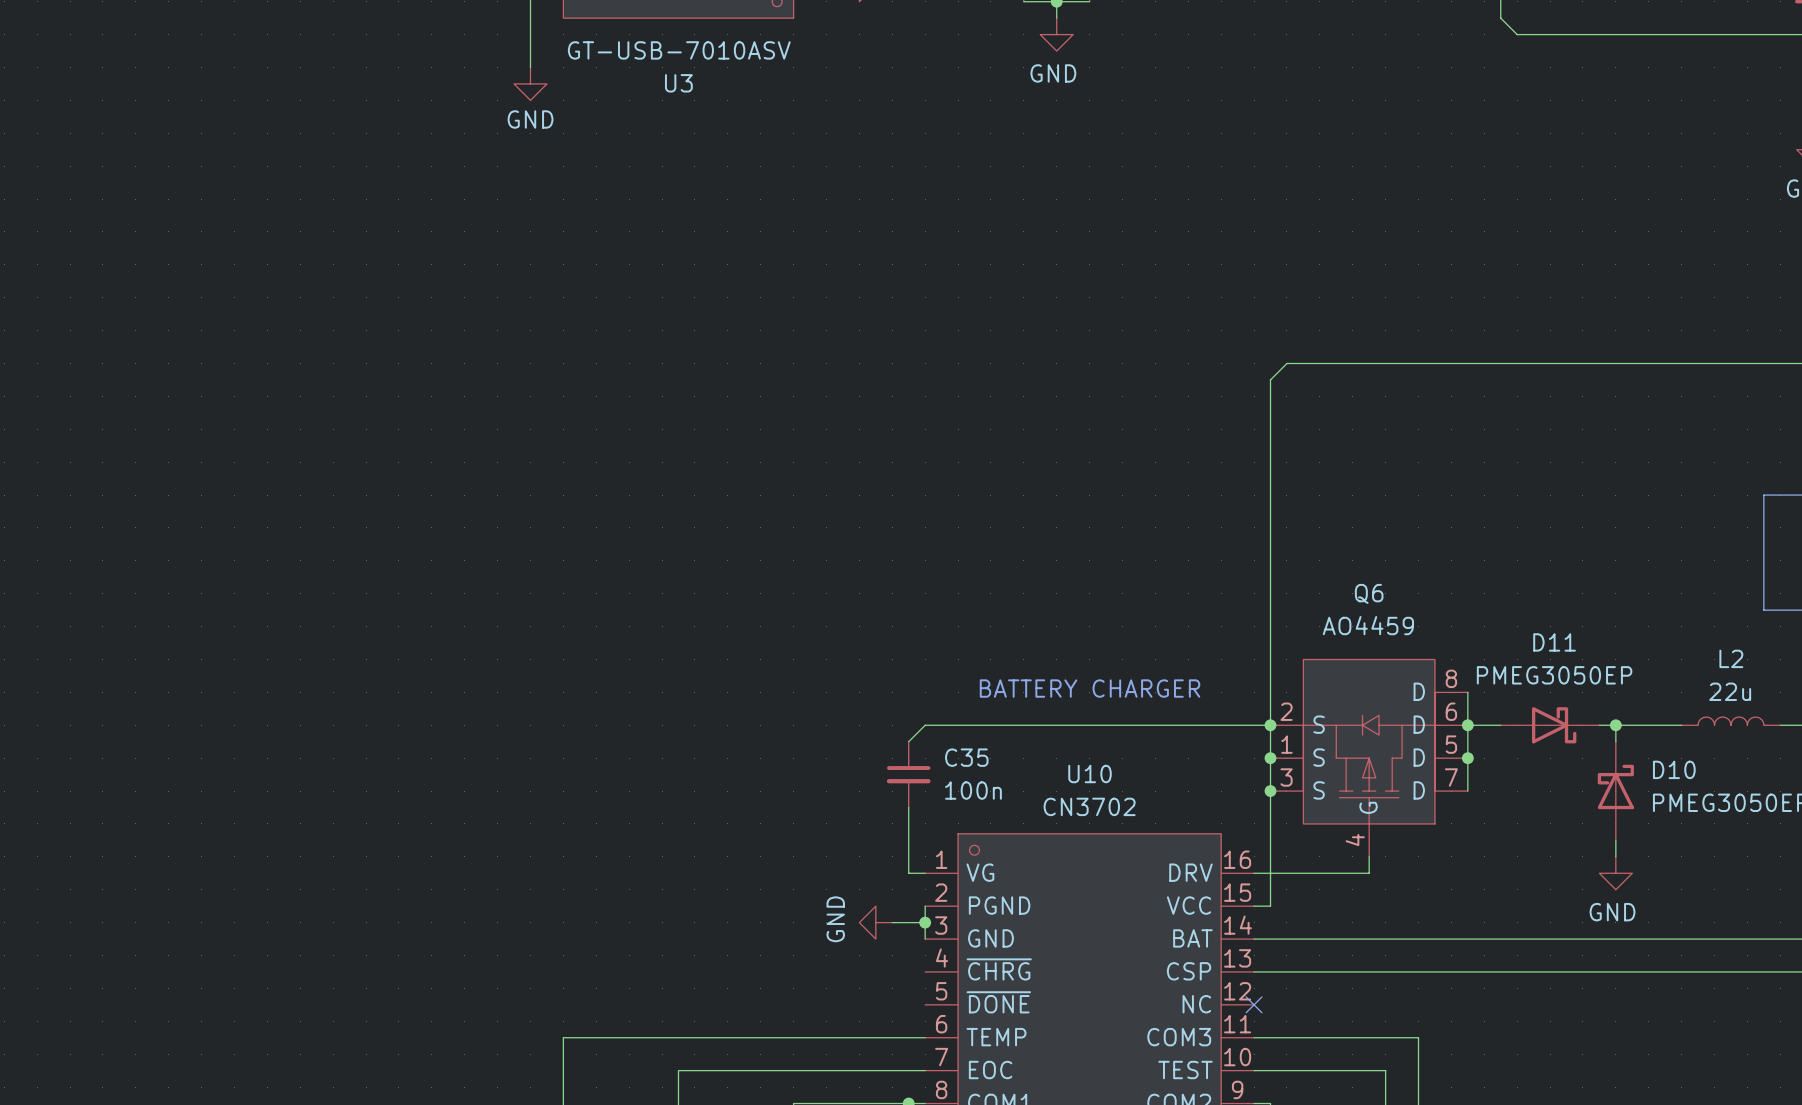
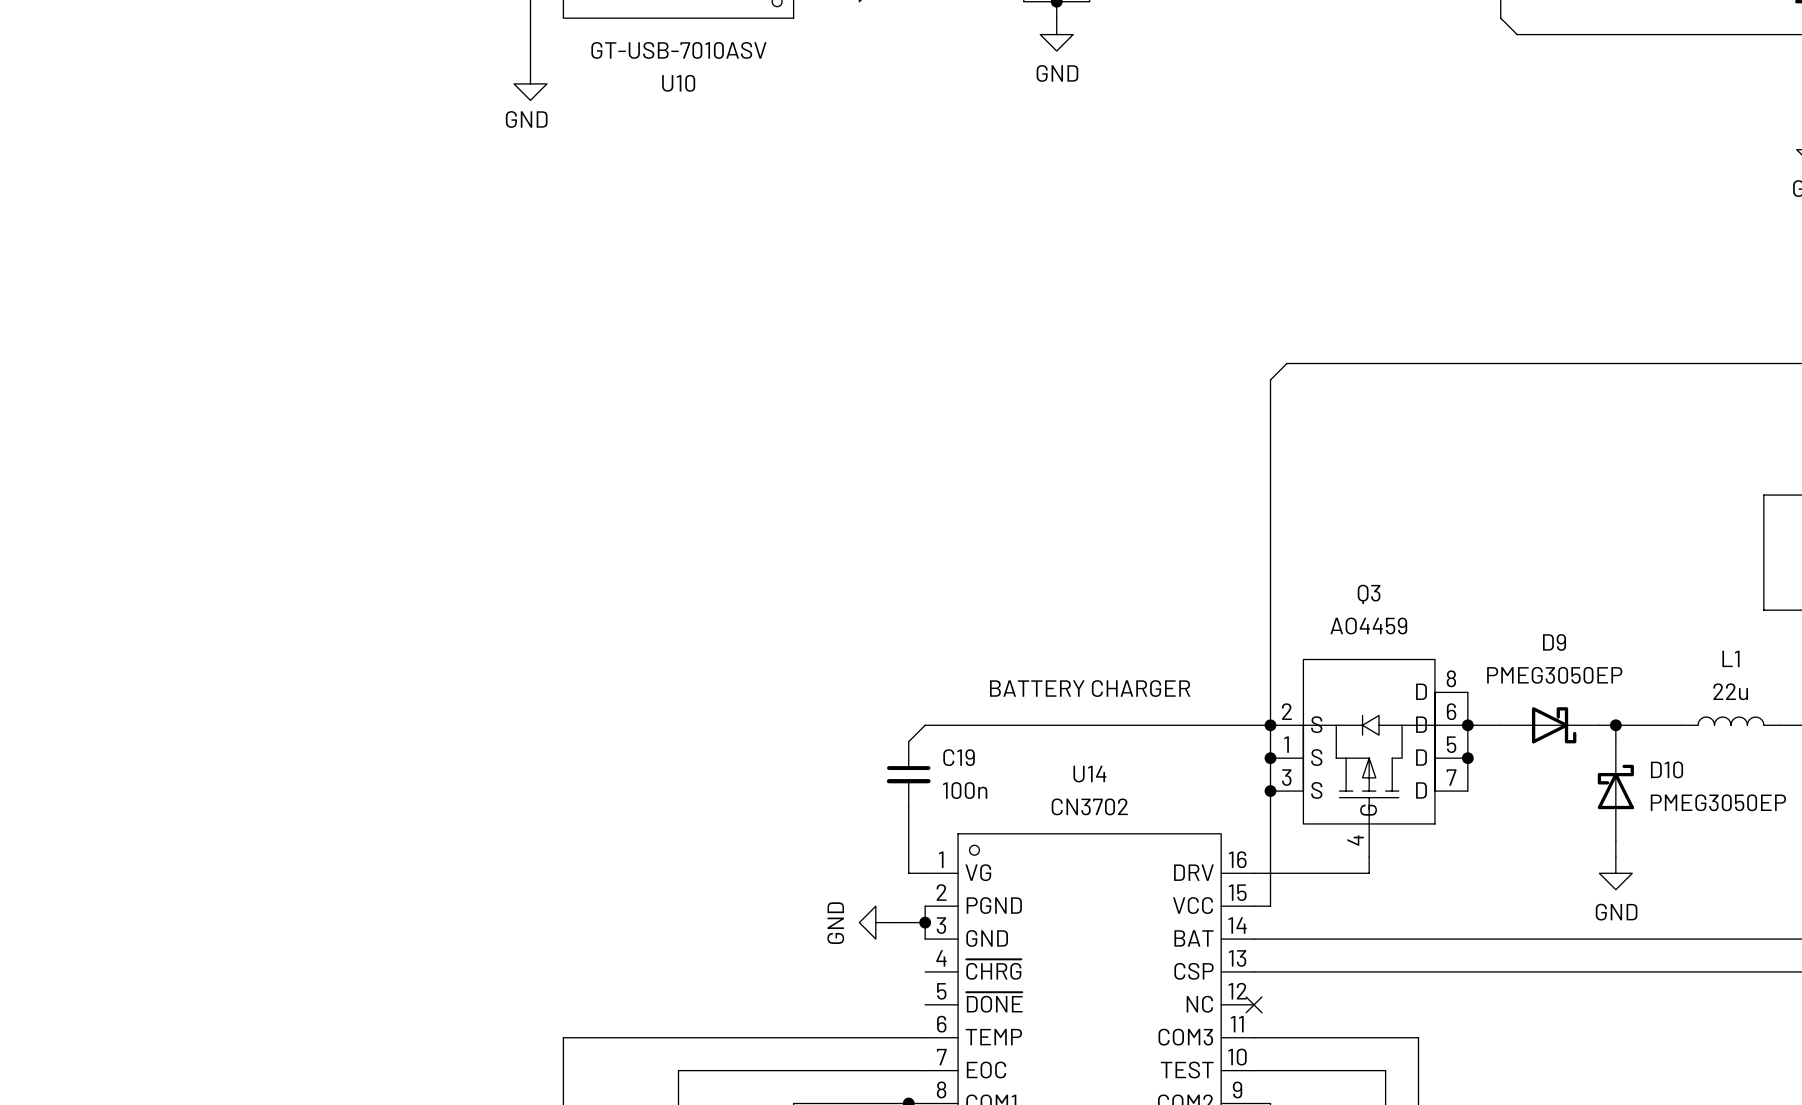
U3 name: U3 (678, 83) -> U10 (678, 83)
Q6 name: Q6 (1369, 593) -> Q3 (1369, 594)
D11 name: D11 (1554, 642) -> D9 (1554, 642)
L2 name: L2 (1731, 658) -> L1 (1730, 658)
C35 name: C35 (966, 757) -> C19 (959, 757)
U10 name: U10 (1090, 774) -> U14 (1089, 774)

